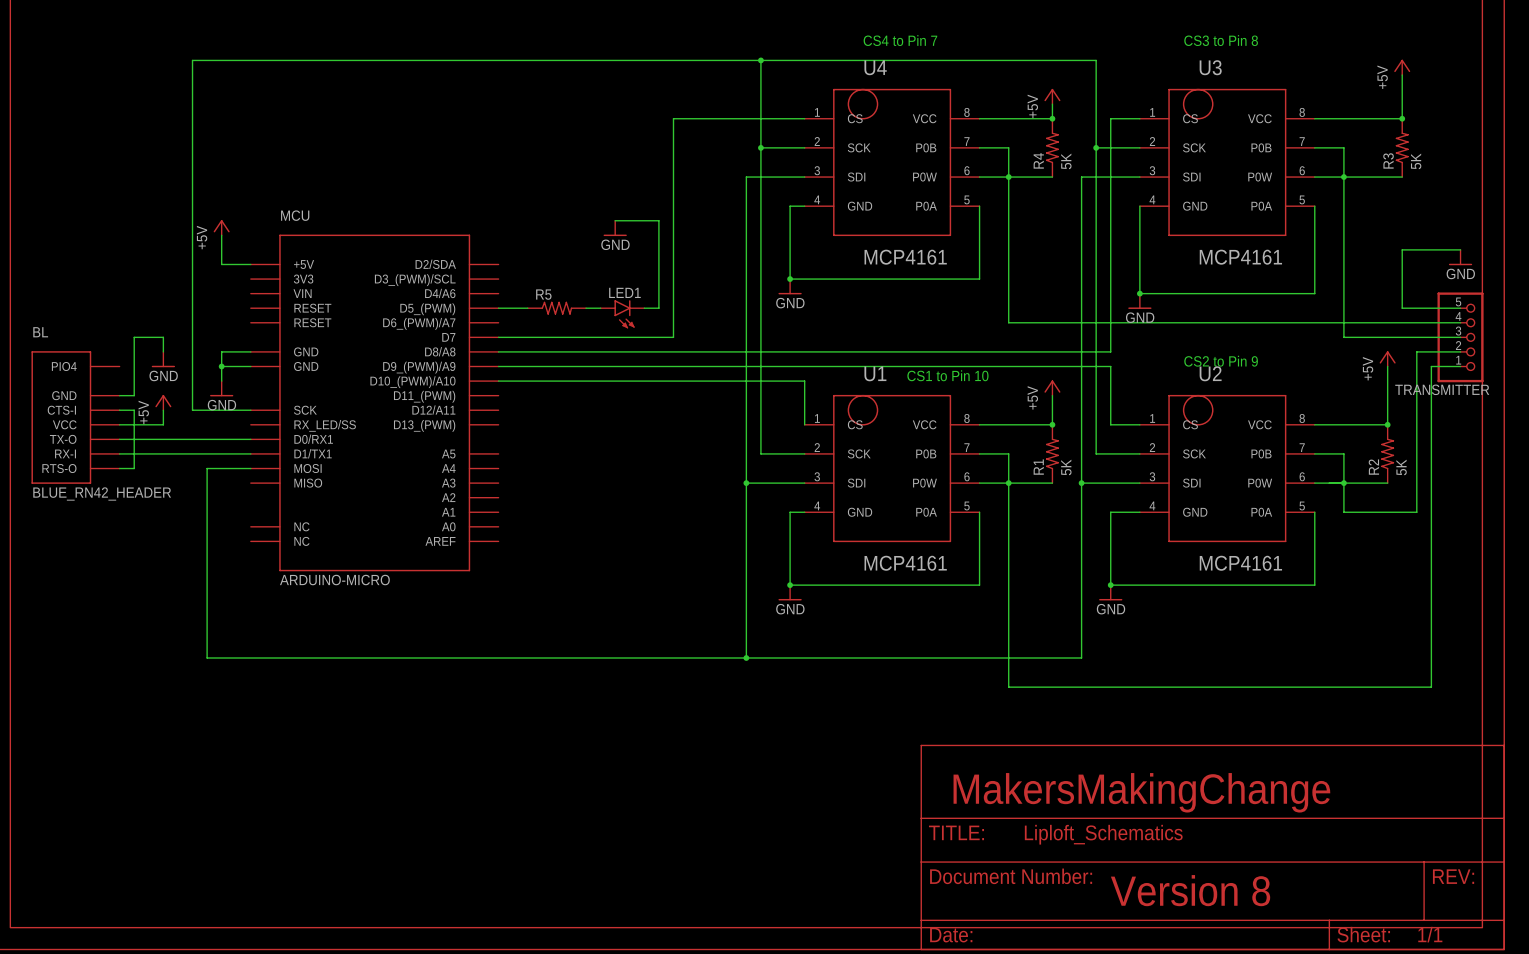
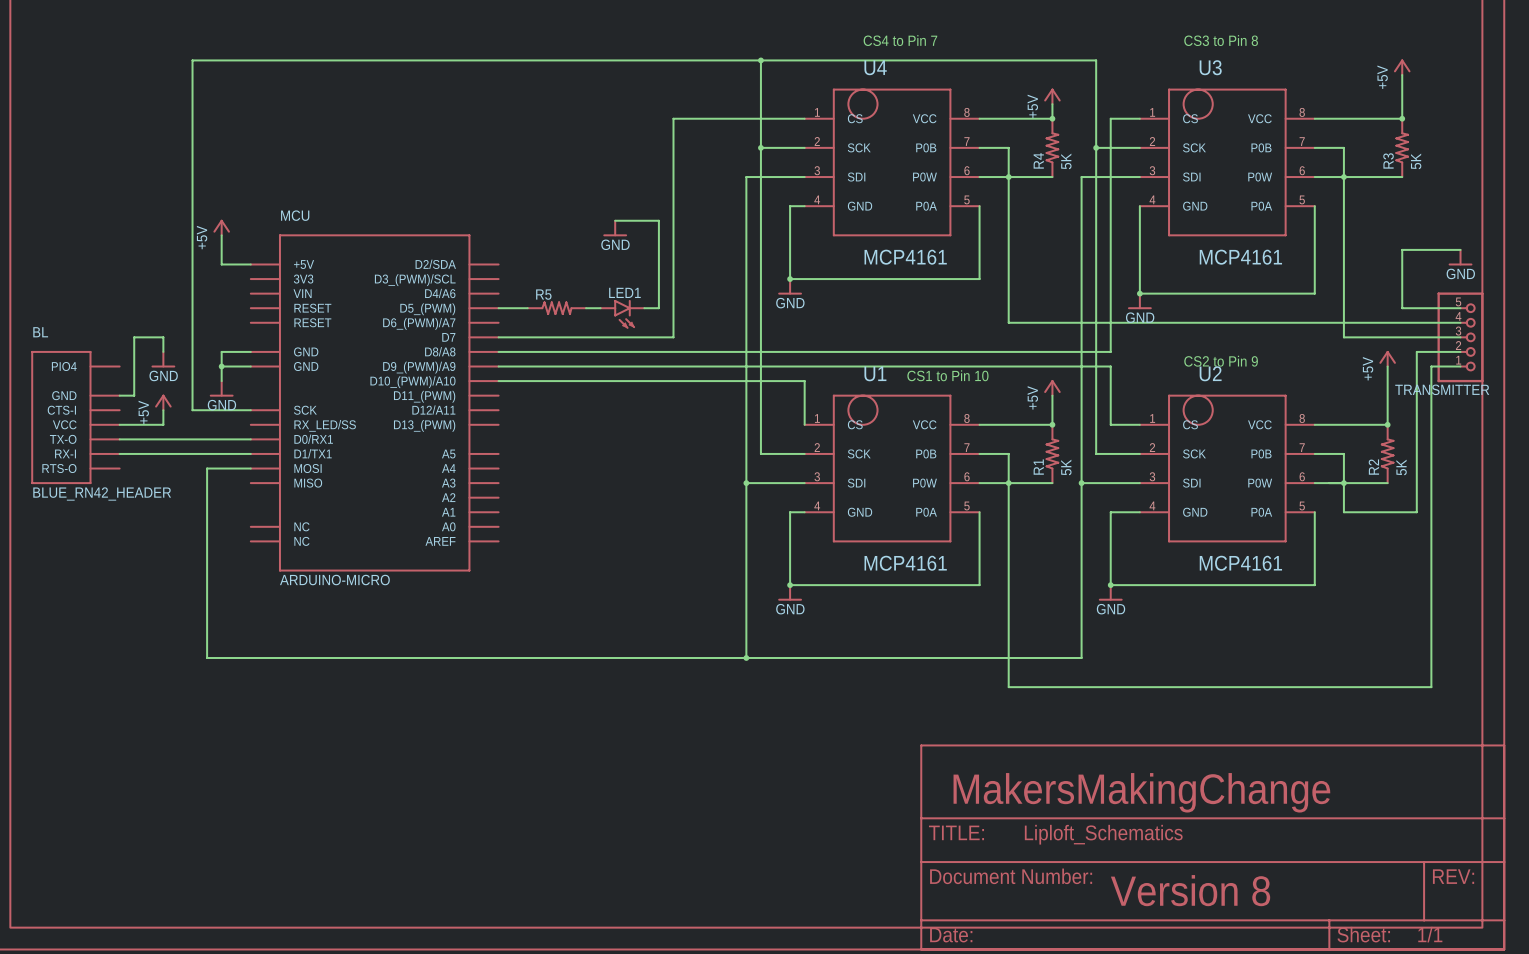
wire: (119, 410) (134, 410) (134, 468) (119, 468) -> none

